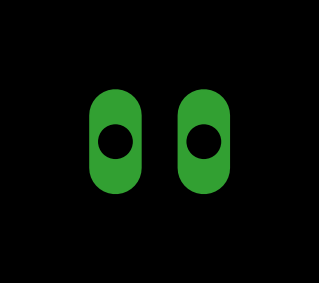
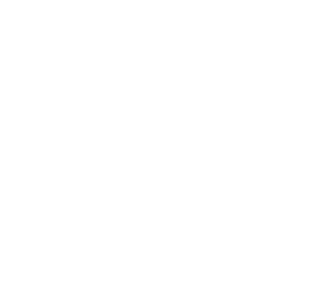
part: (159, 141) -> none

